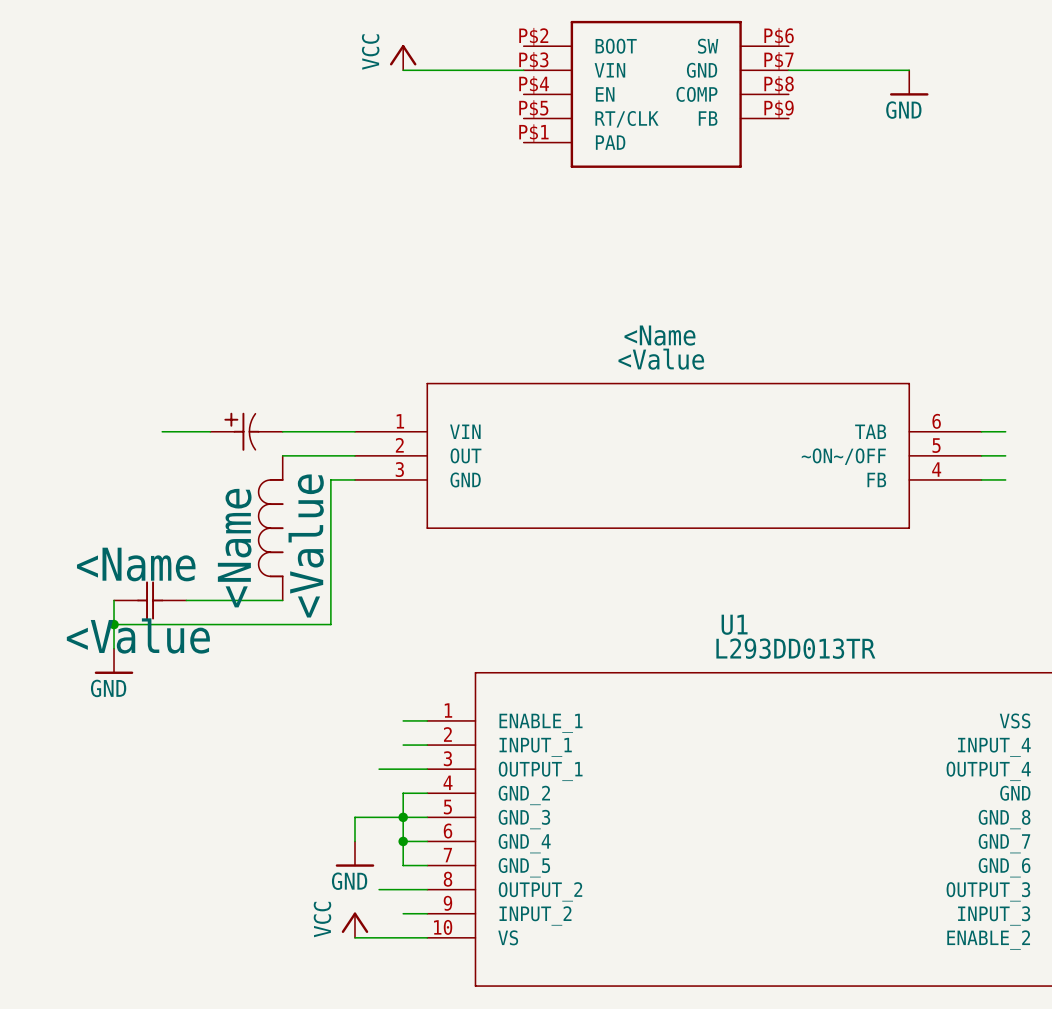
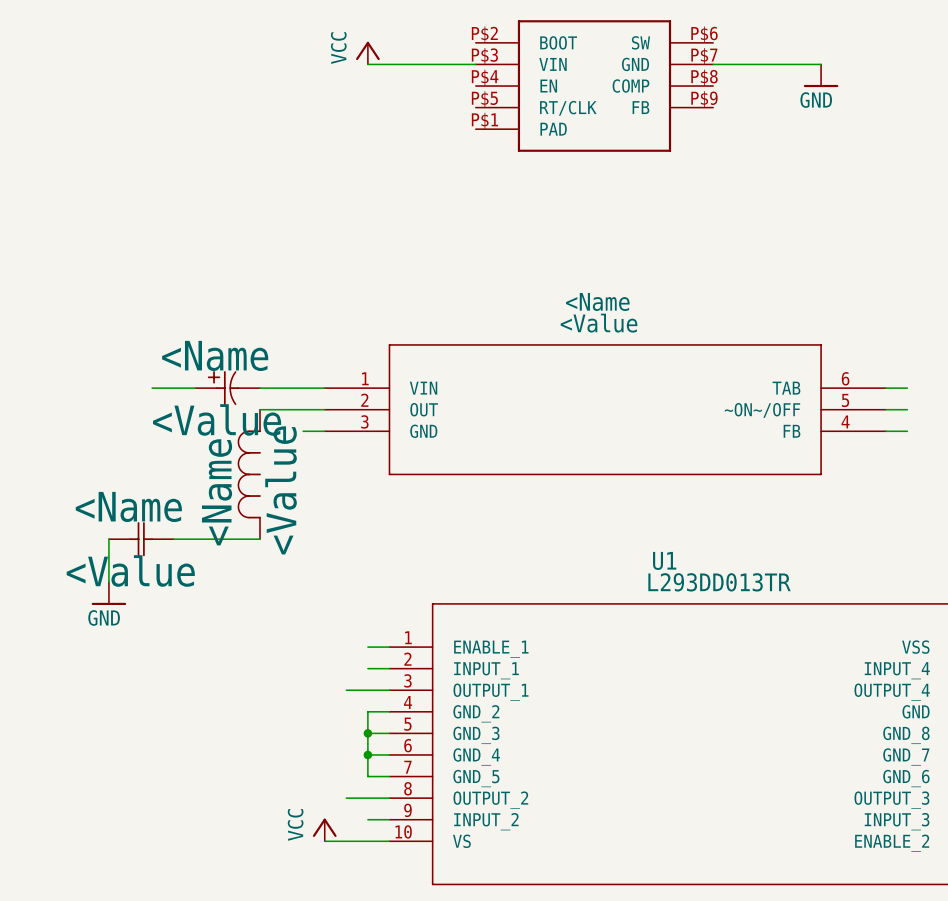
part text: none -> <Name (215, 355)
part text: none -> <Value (217, 419)
wire: (330, 479) (330, 624) (114, 624) -> none
junction: (114, 624) -> none
wire: (403, 817) (354, 817) (354, 841) -> none
power symbol: GND (354, 854) -> none

